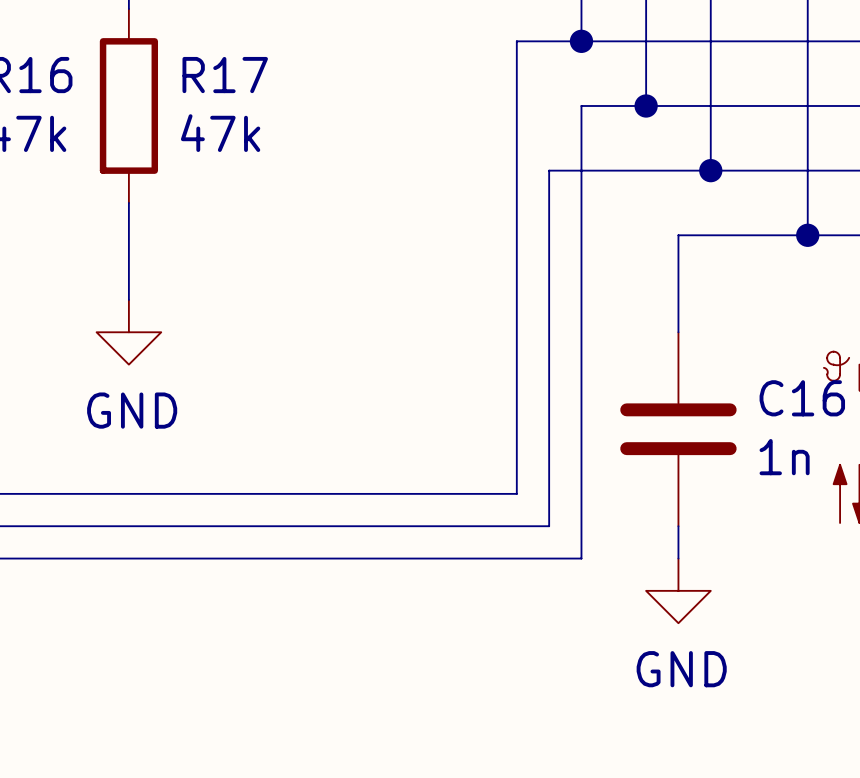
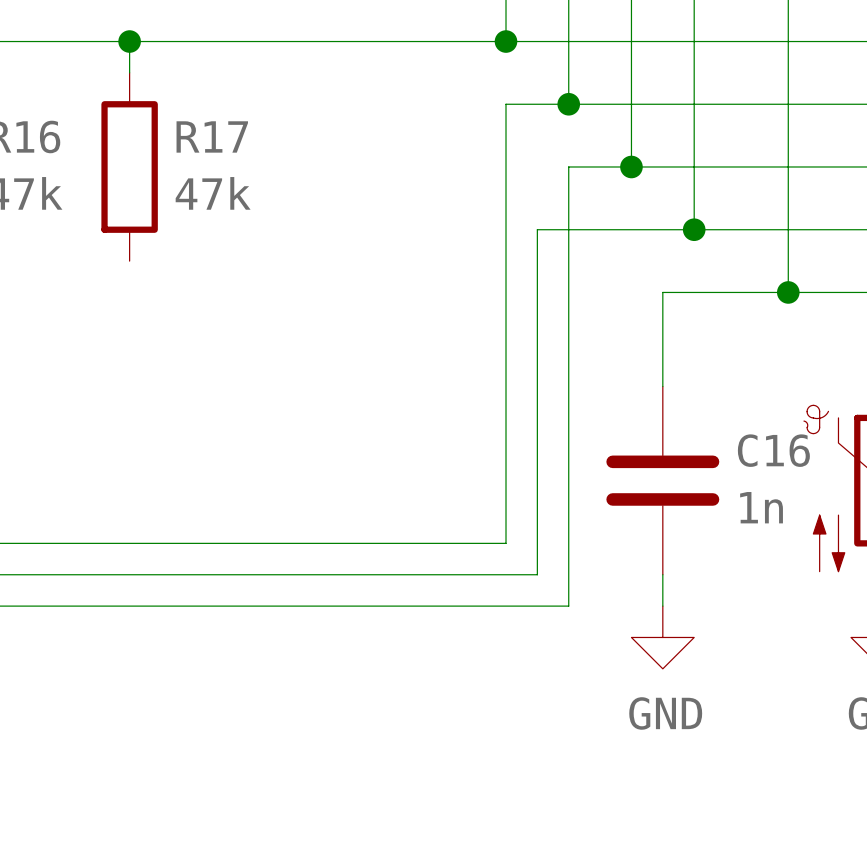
wire: (128, 202) (128, 299) -> none
power symbol: GND (128, 332) -> none

